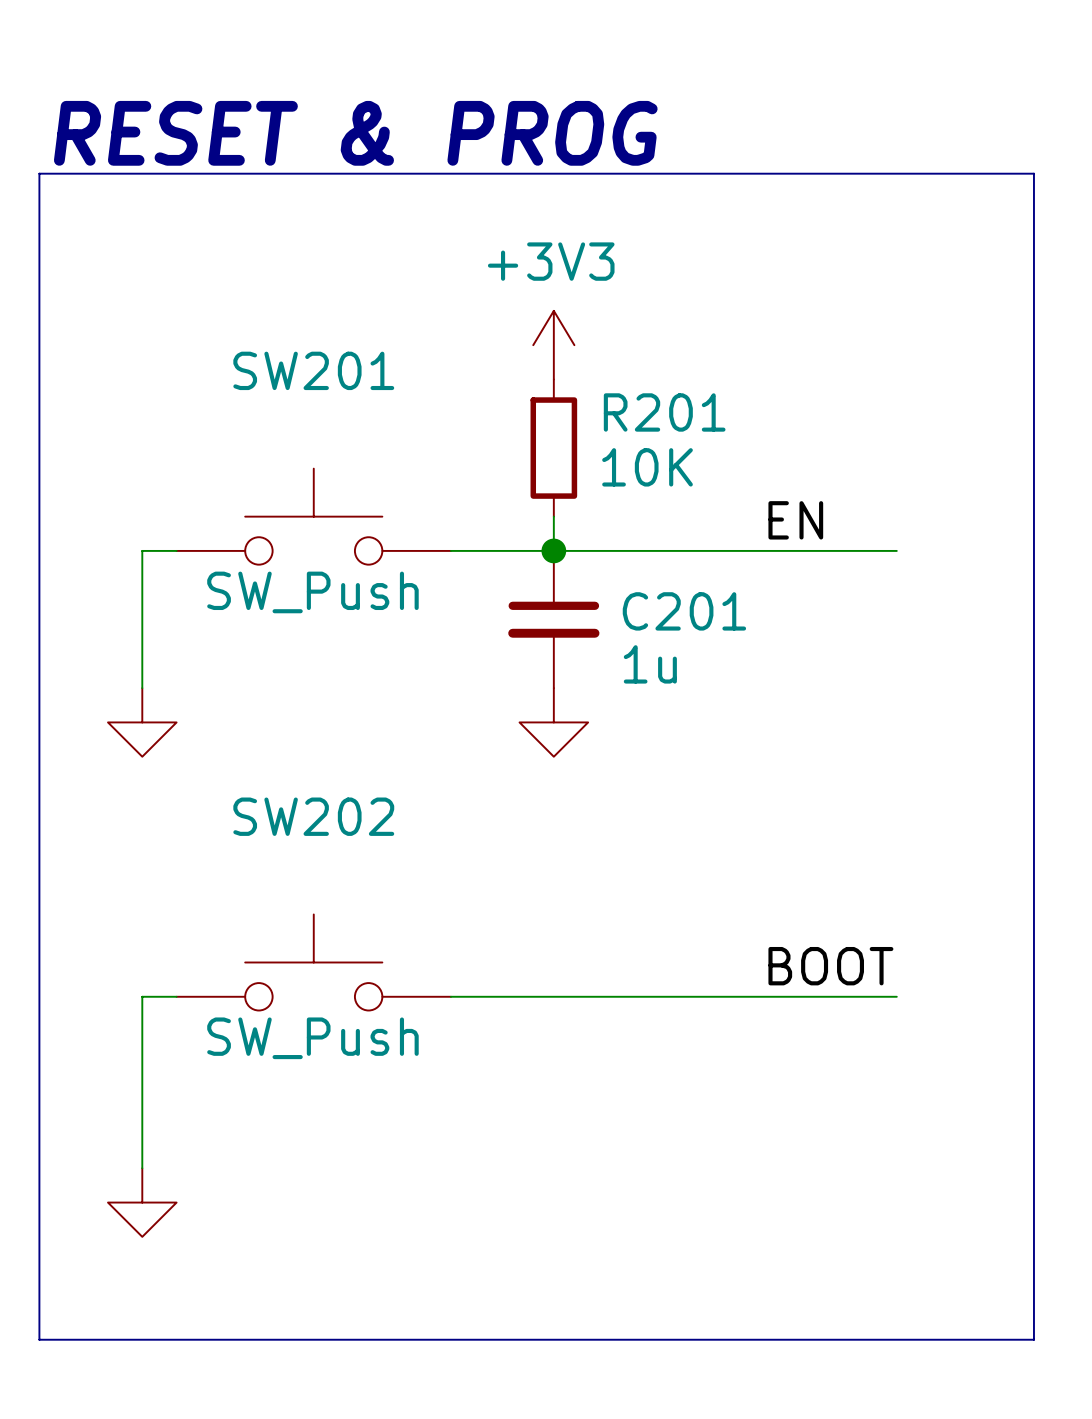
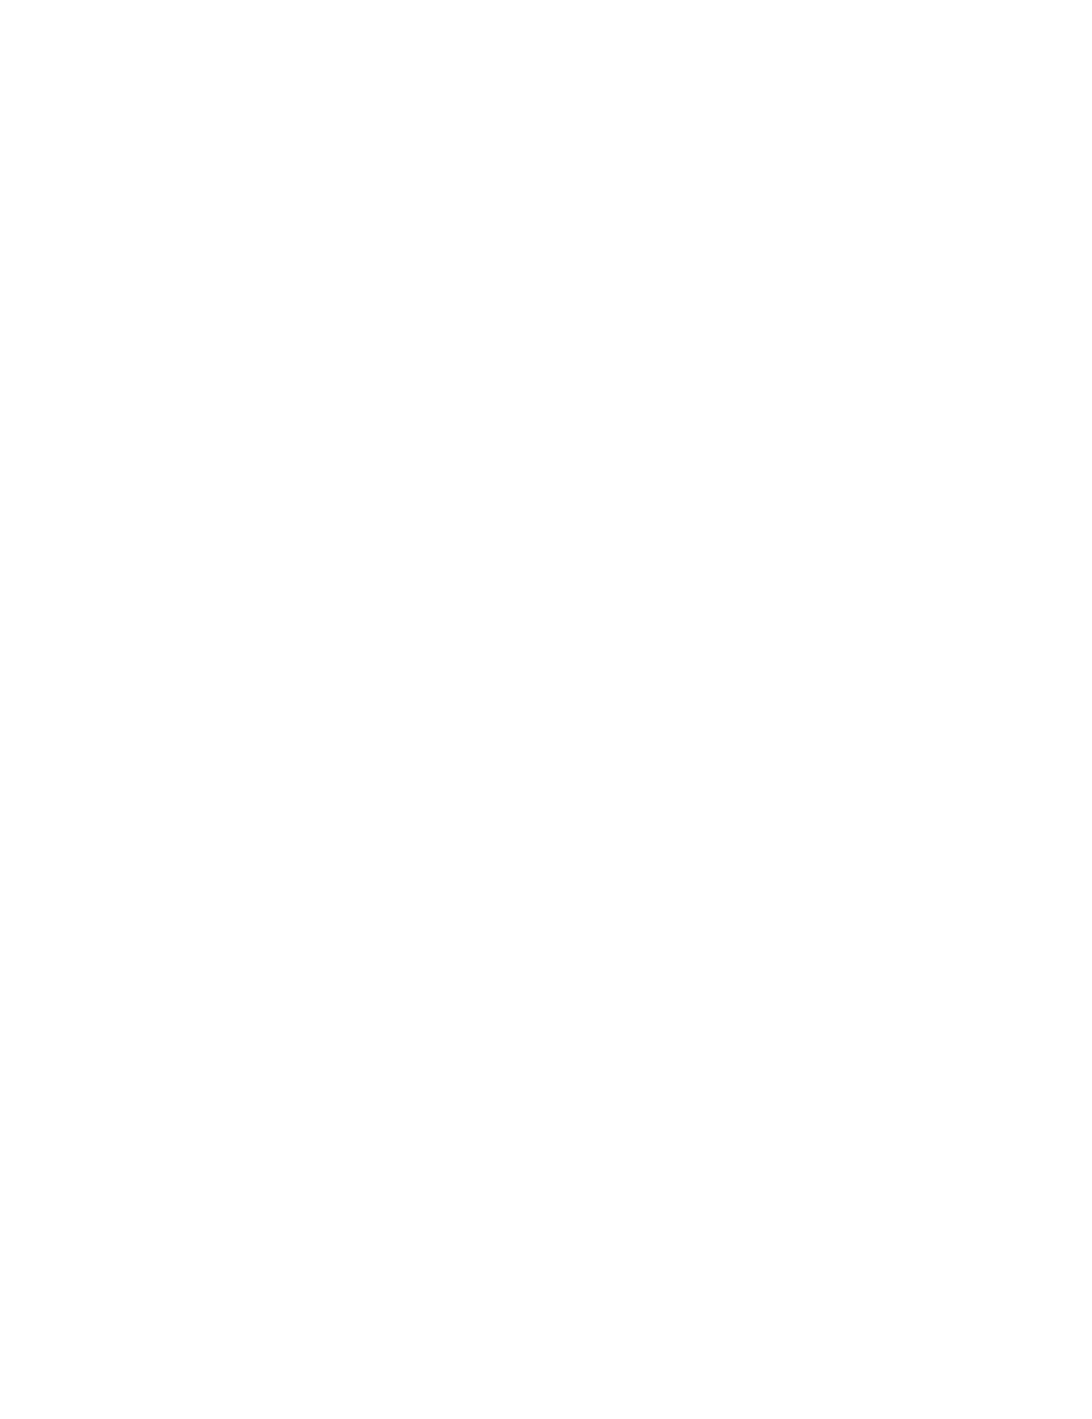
text: RESET & PROG (355, 133) -> none
line: (39, 173) (1033, 173) (1033, 1339) (39, 1339) (39, 173) -> none
power symbol: +3V3 (553, 345) -> none
R201: 10K (553, 448) -> none
SW201: SW_Push (313, 516) -> none
wire: (553, 516) (553, 550) -> none
label: EN (795, 520) -> none
wire: (176, 550) (142, 550) (142, 688) -> none
wire: (450, 550) (896, 550) -> none
junction: (553, 550) -> none
C201: 1u (553, 619) -> none
power symbol: (142, 722) -> none
power symbol: (553, 722) -> none
SW202: SW_Push (313, 962) -> none
label: BOOT (830, 966) -> none
wire: (176, 996) (142, 996) (142, 1168) -> none
wire: (450, 996) (896, 996) -> none
power symbol: (142, 1202) -> none

